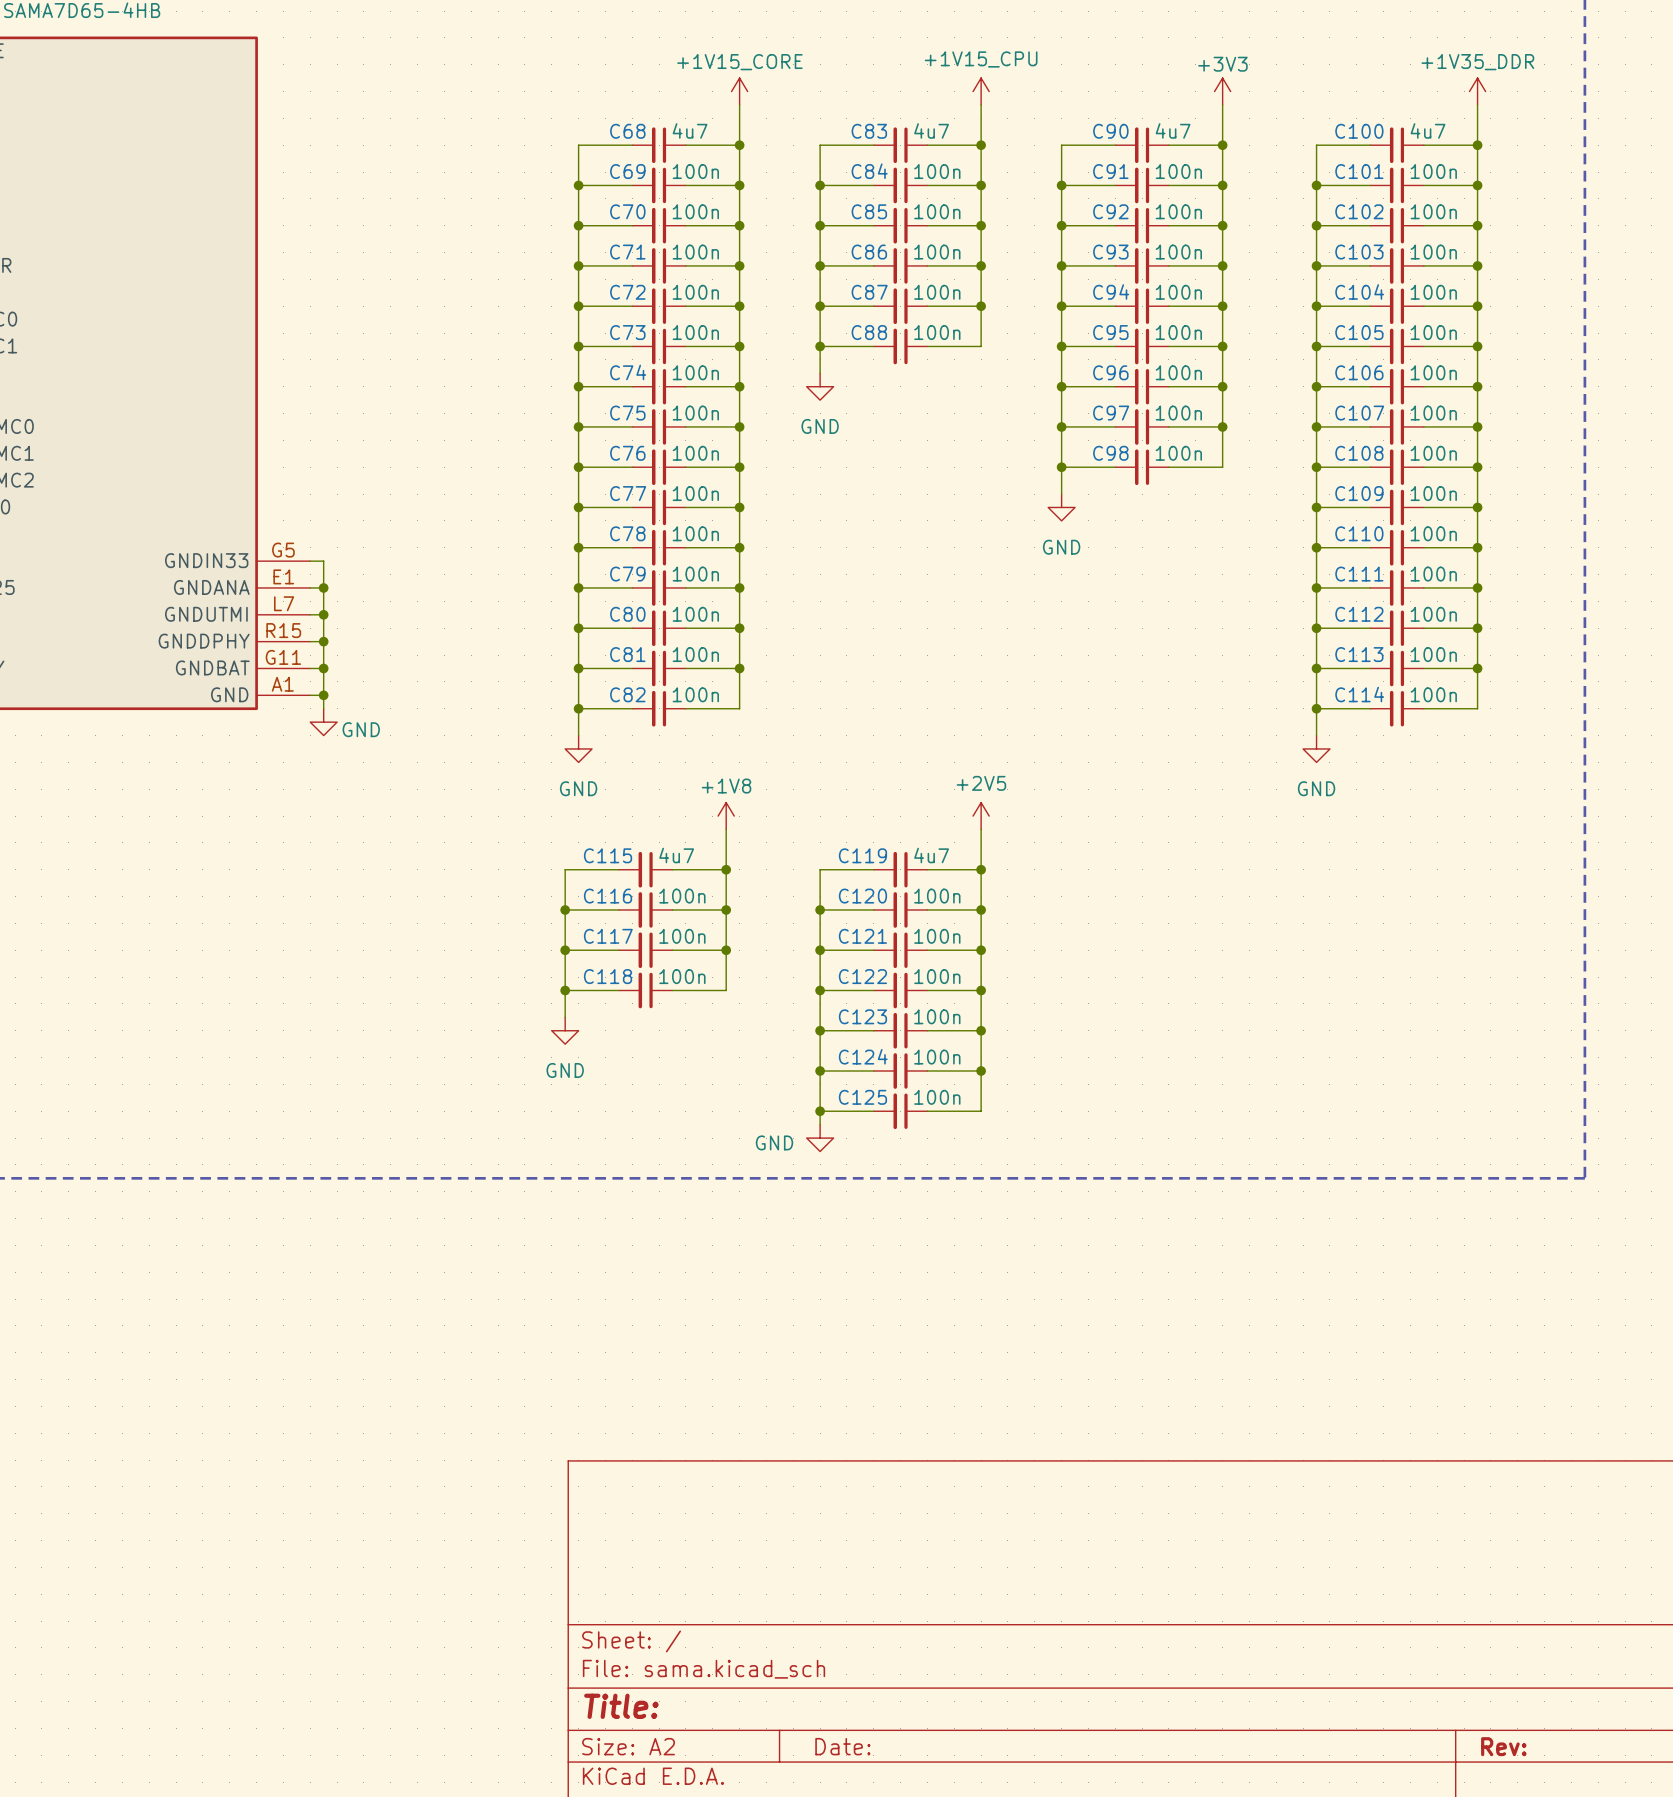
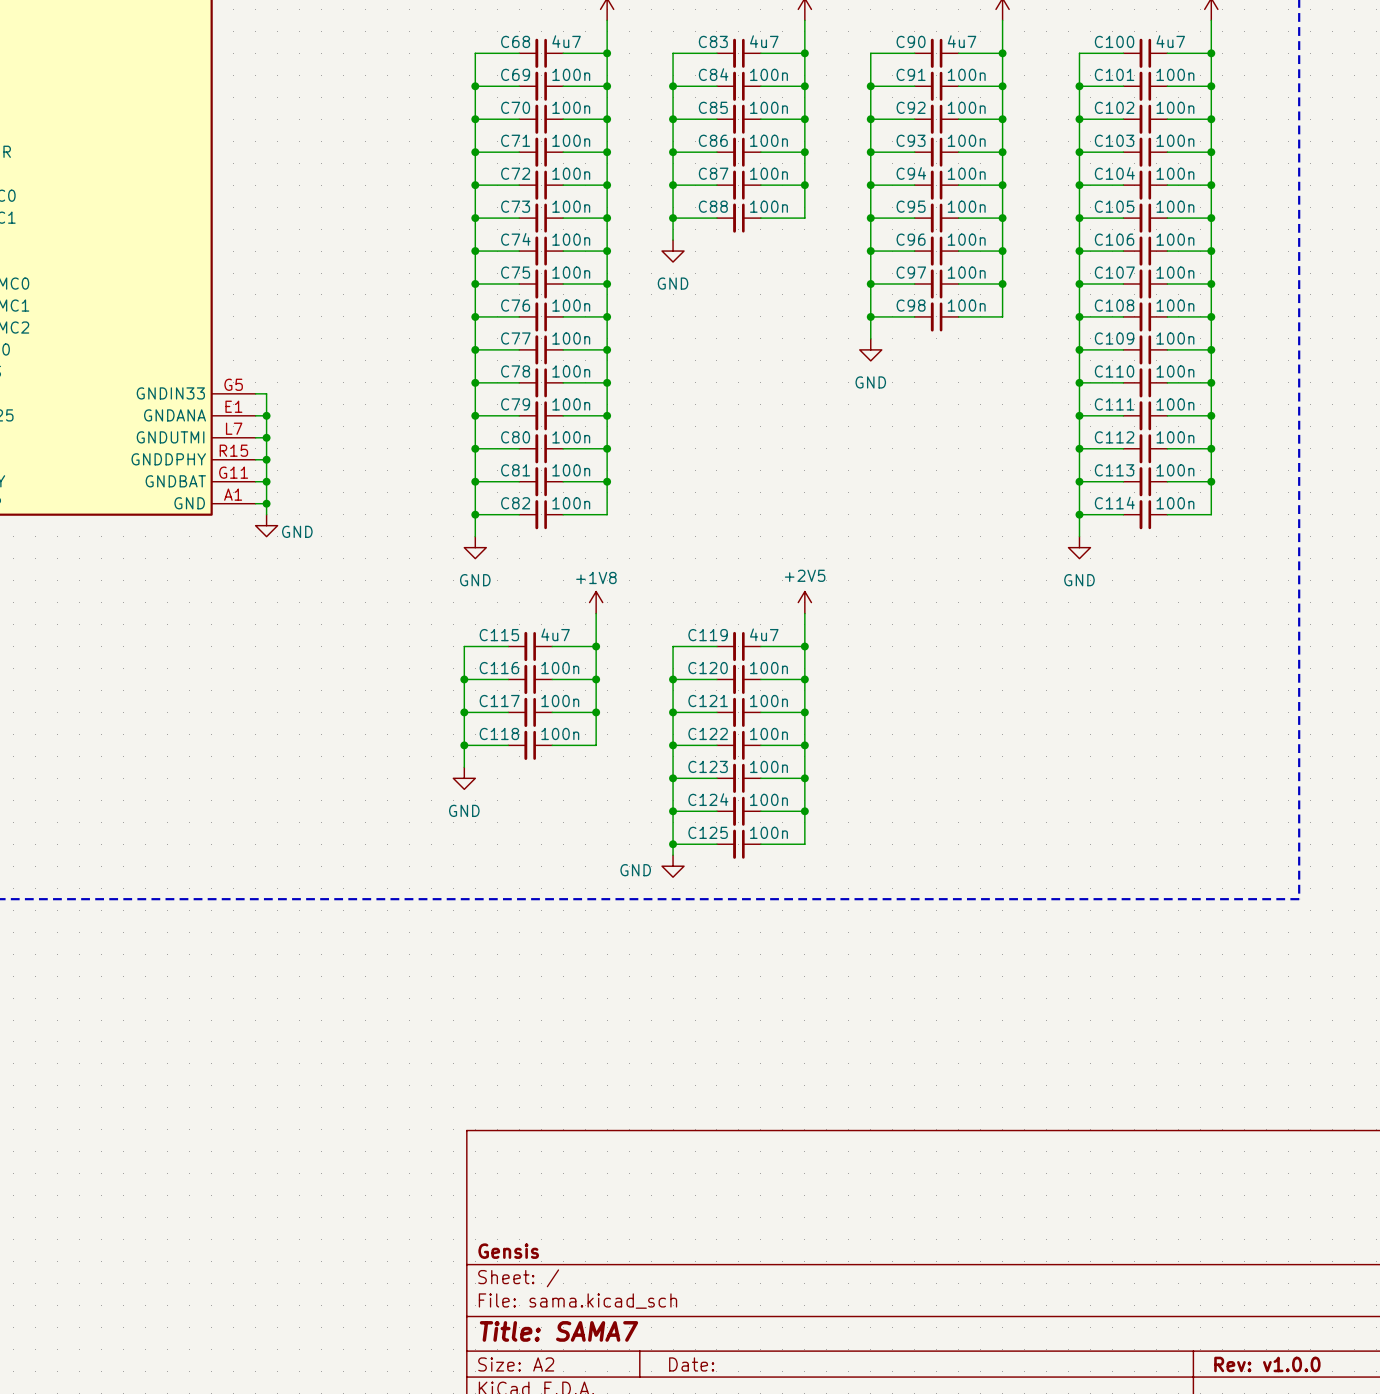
title block: none -> Gensis (508, 1251)
title block: Title: (621, 1706) -> Title: SAMA7 (558, 1331)
title block: Rev: (1503, 1746) -> Rev: v1.0.0 (1267, 1364)

